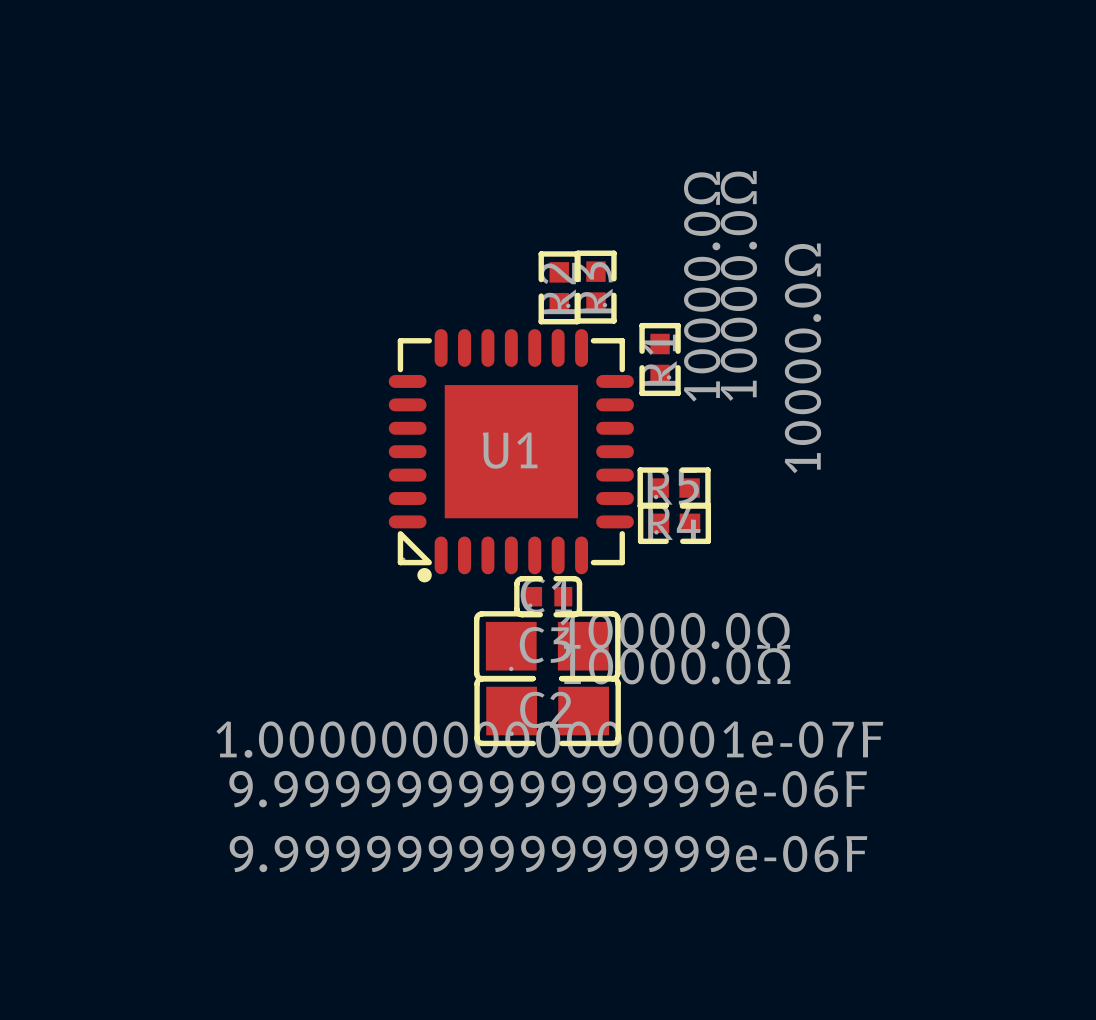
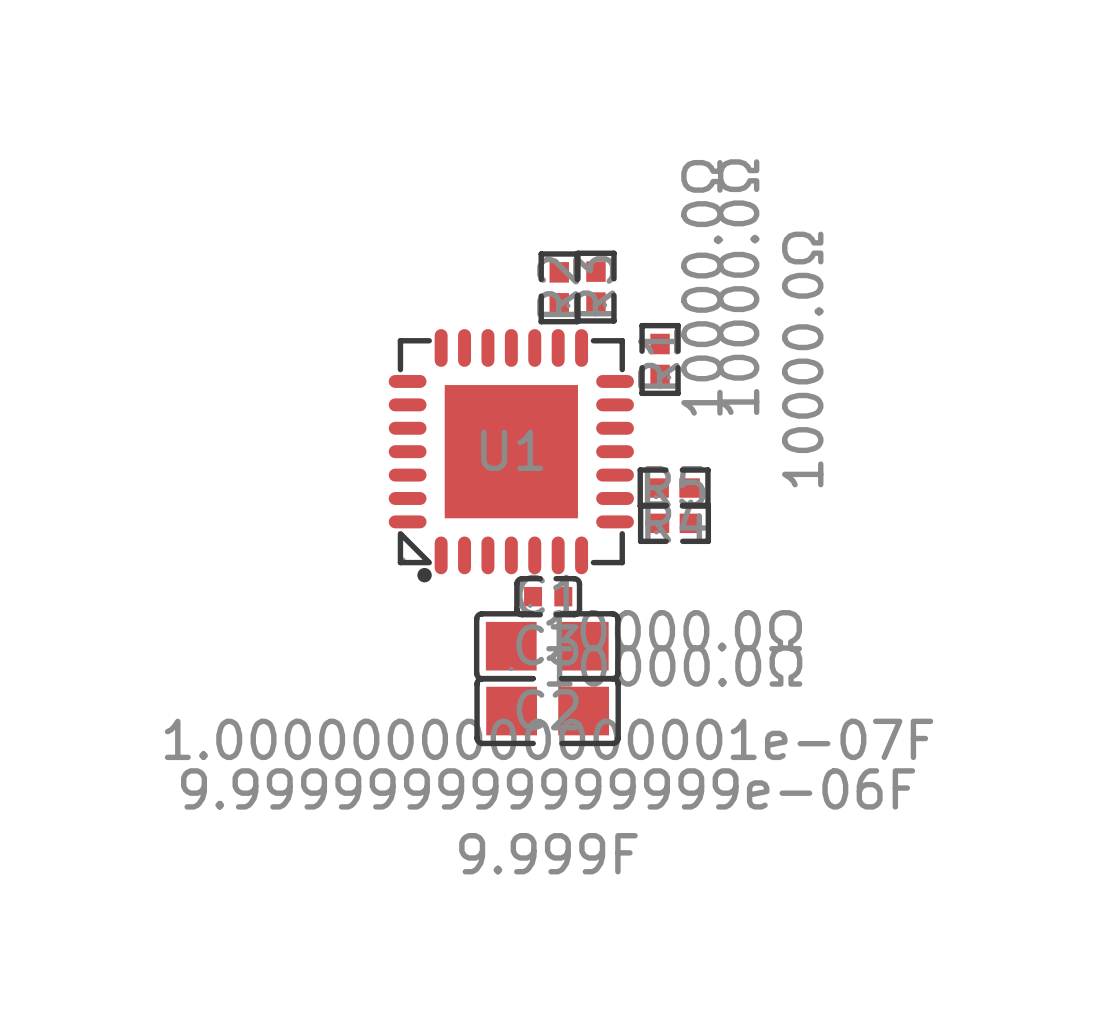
C2 value: 9.999999999999999e-06F (548, 853) -> 9.999F (548, 853)

